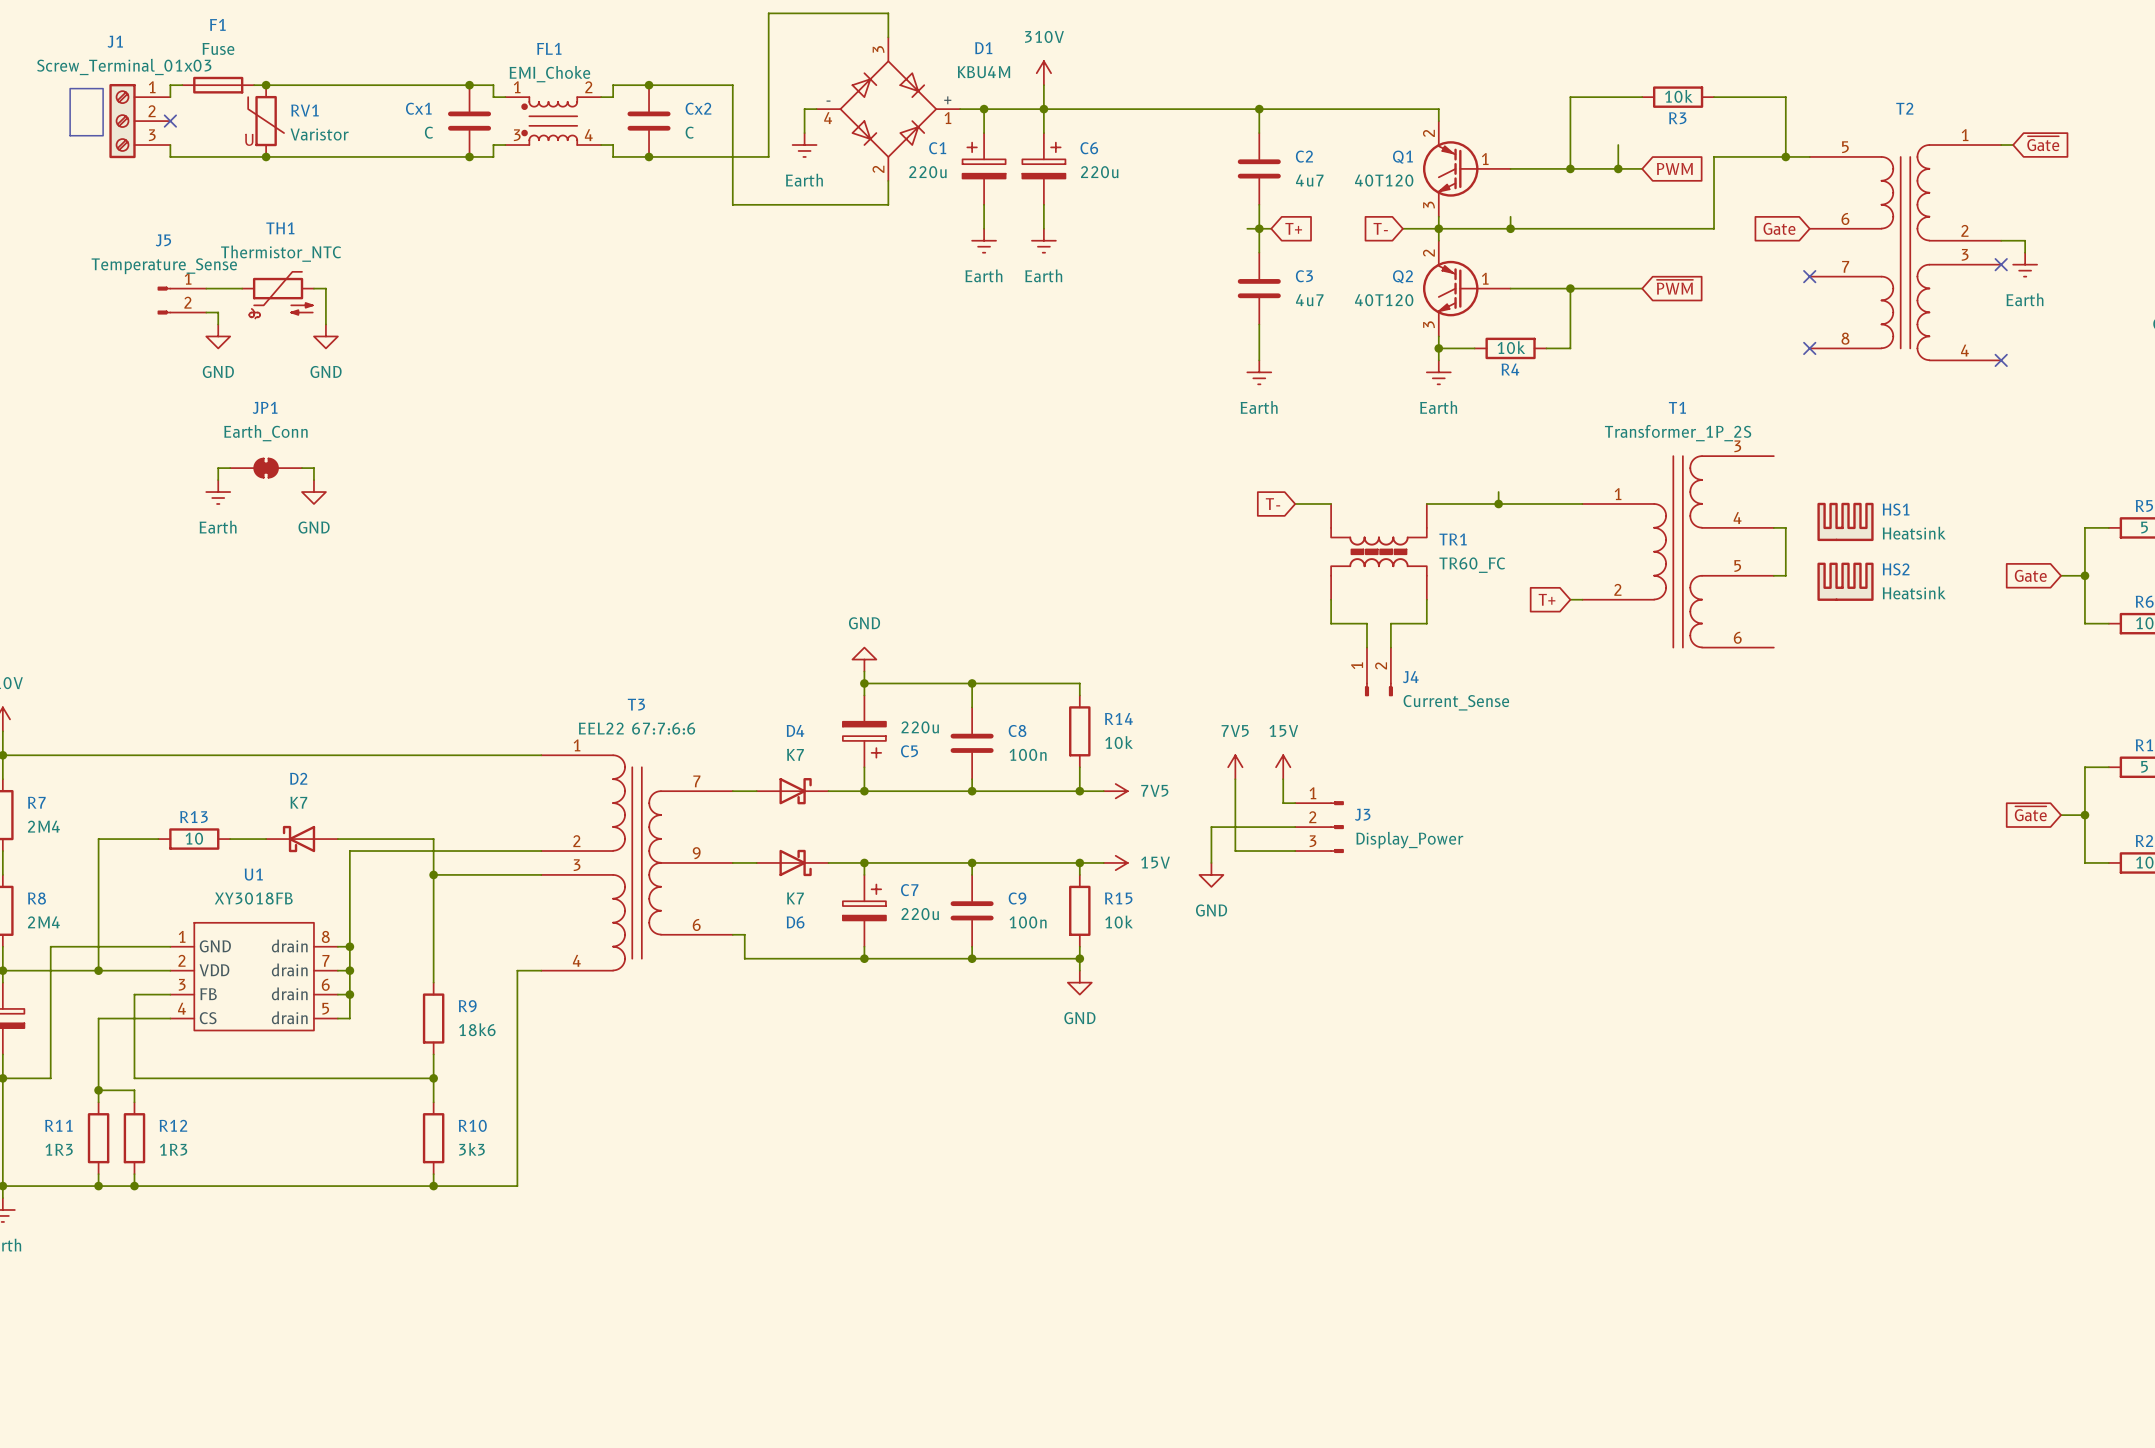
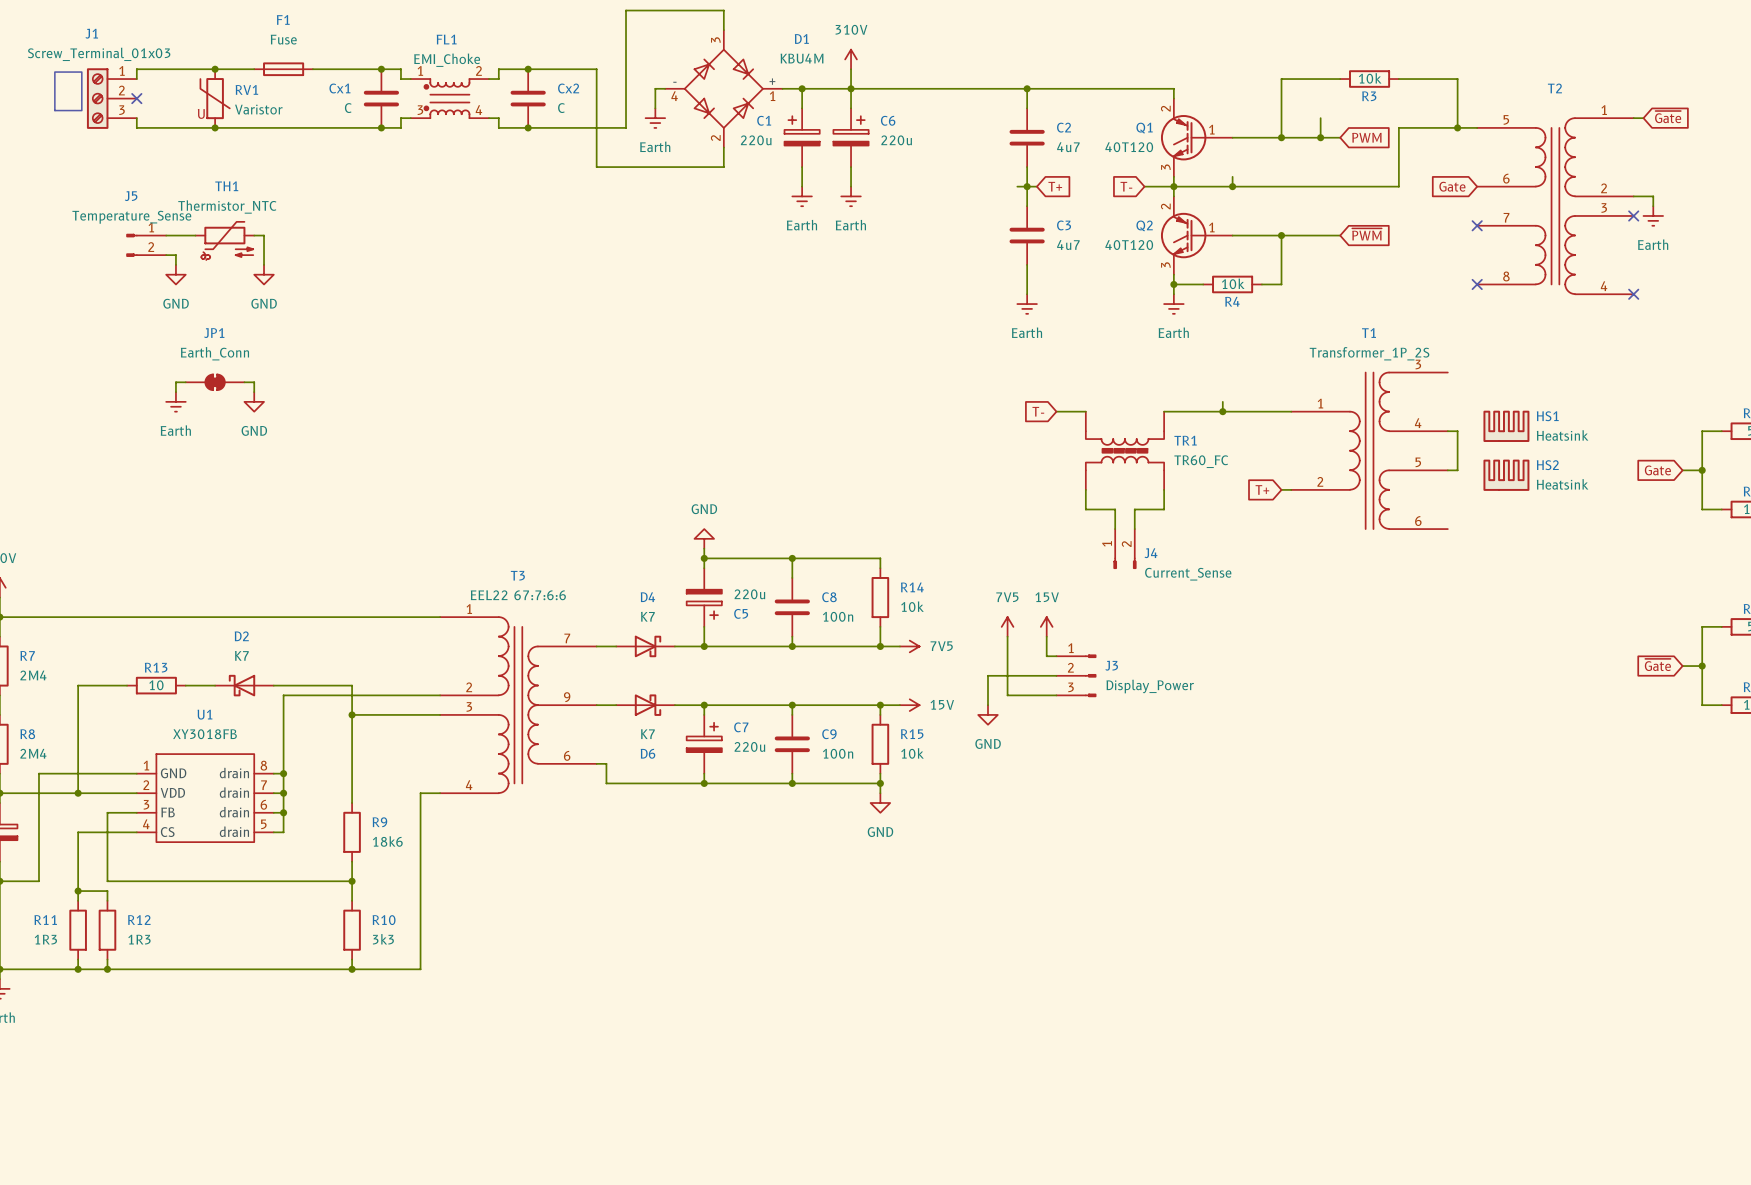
F1 position: (218, 85) -> (283, 69)

